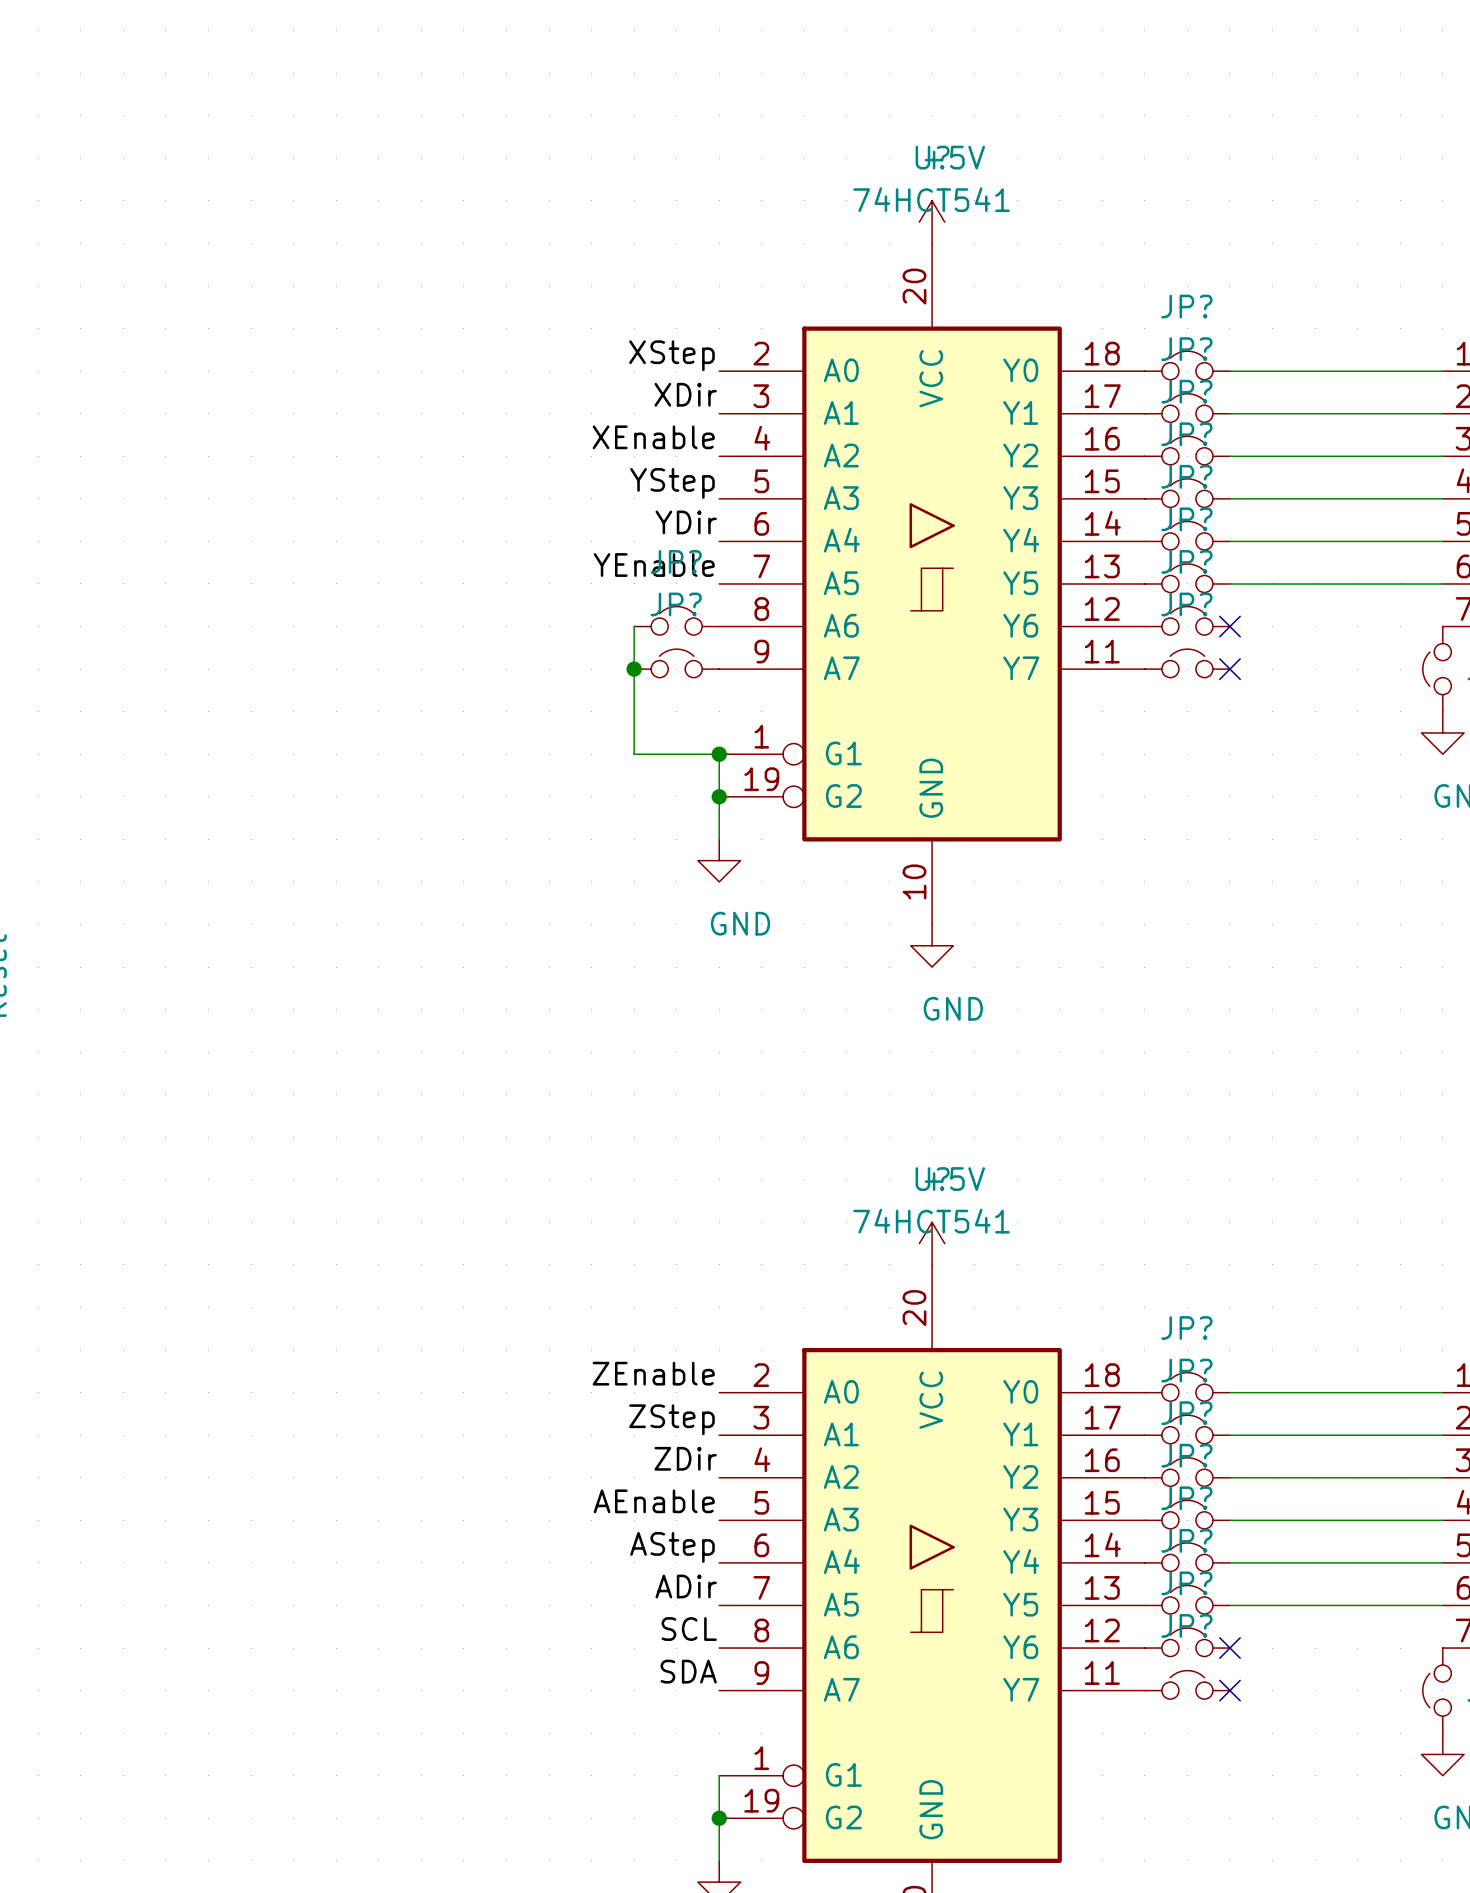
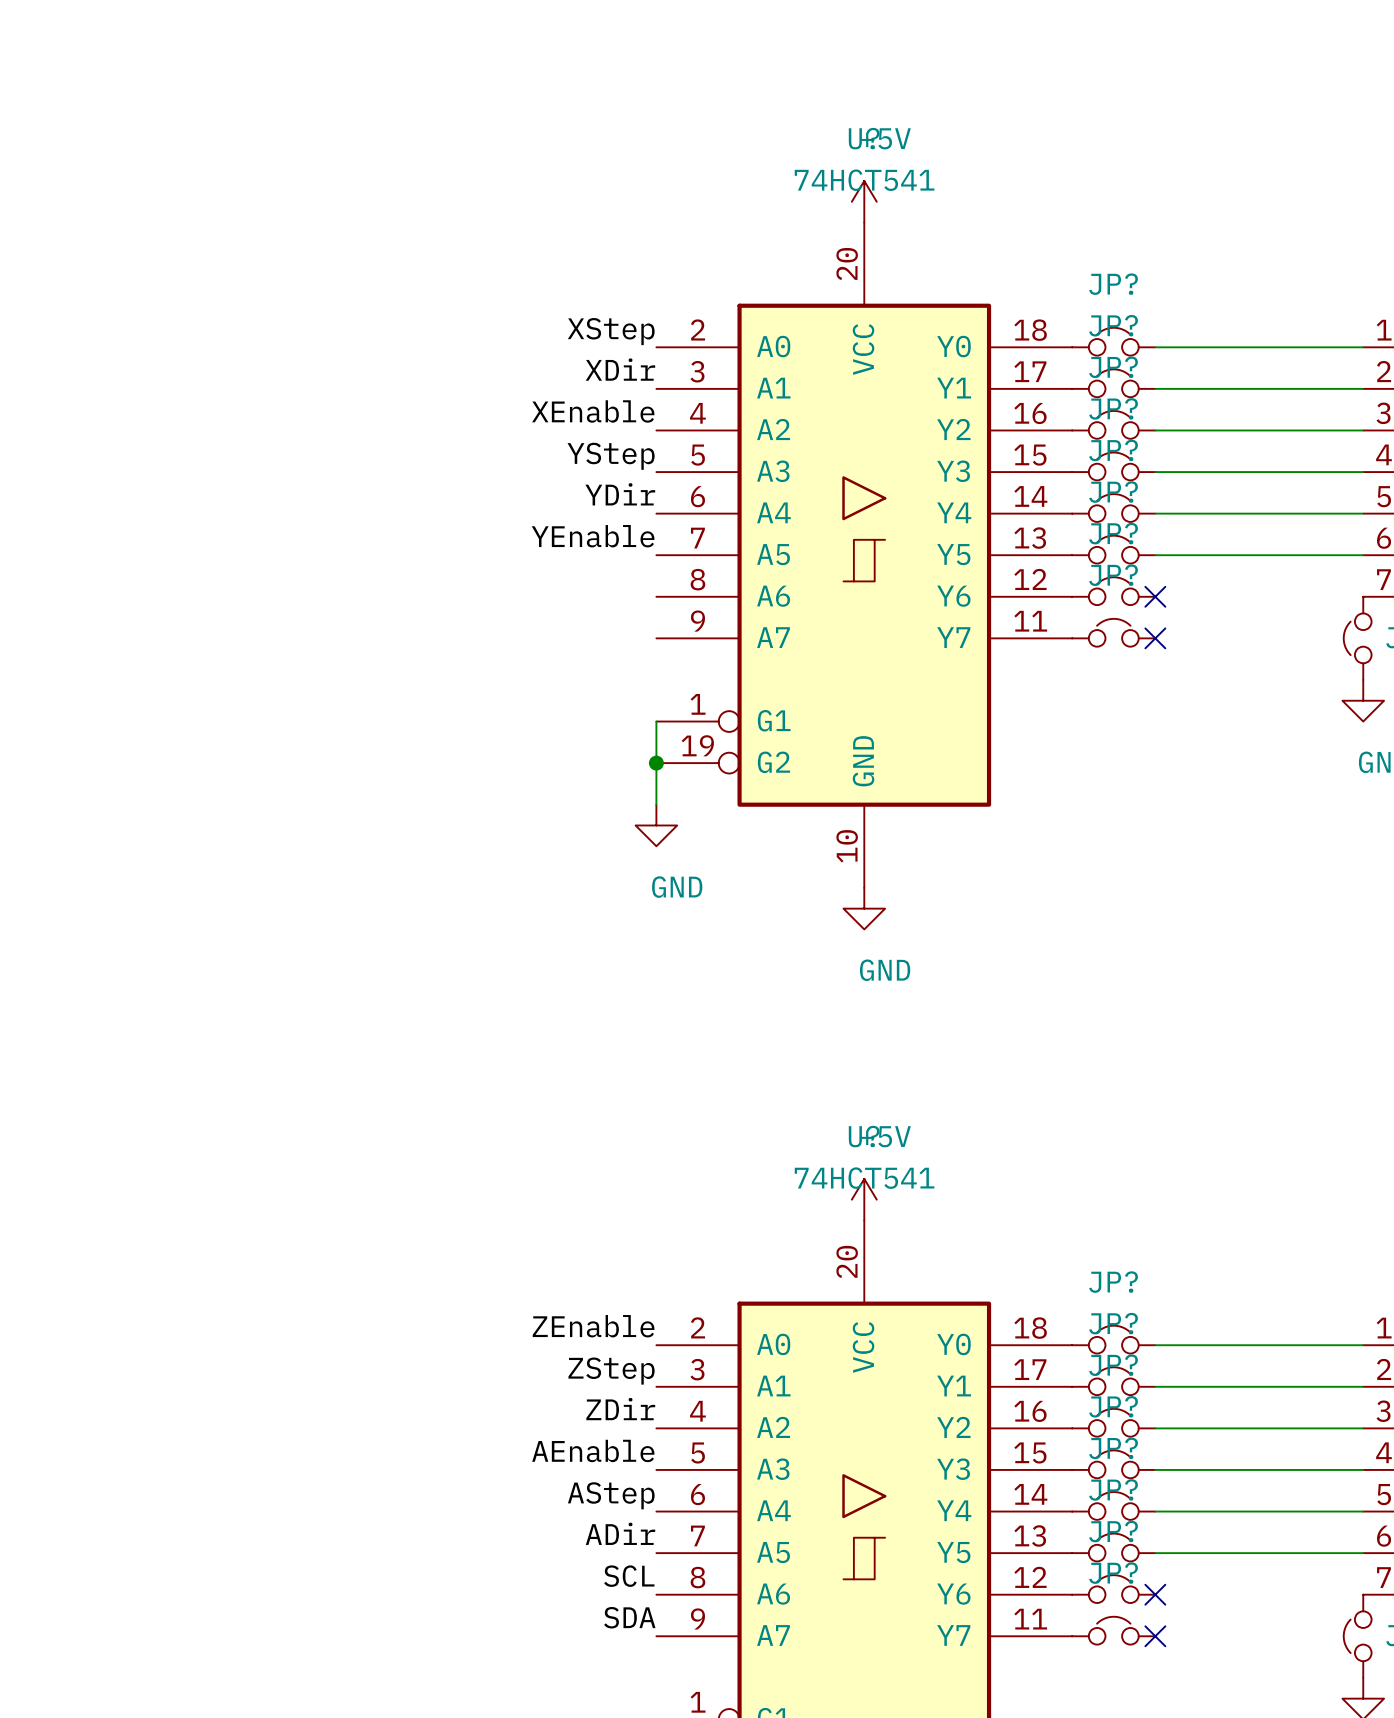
JP?: (676, 620) -> none
wire: (634, 626) (634, 754) (719, 754) -> none
JP?: (676, 663) -> none
junction: (634, 669) -> none
junction: (719, 754) -> none

